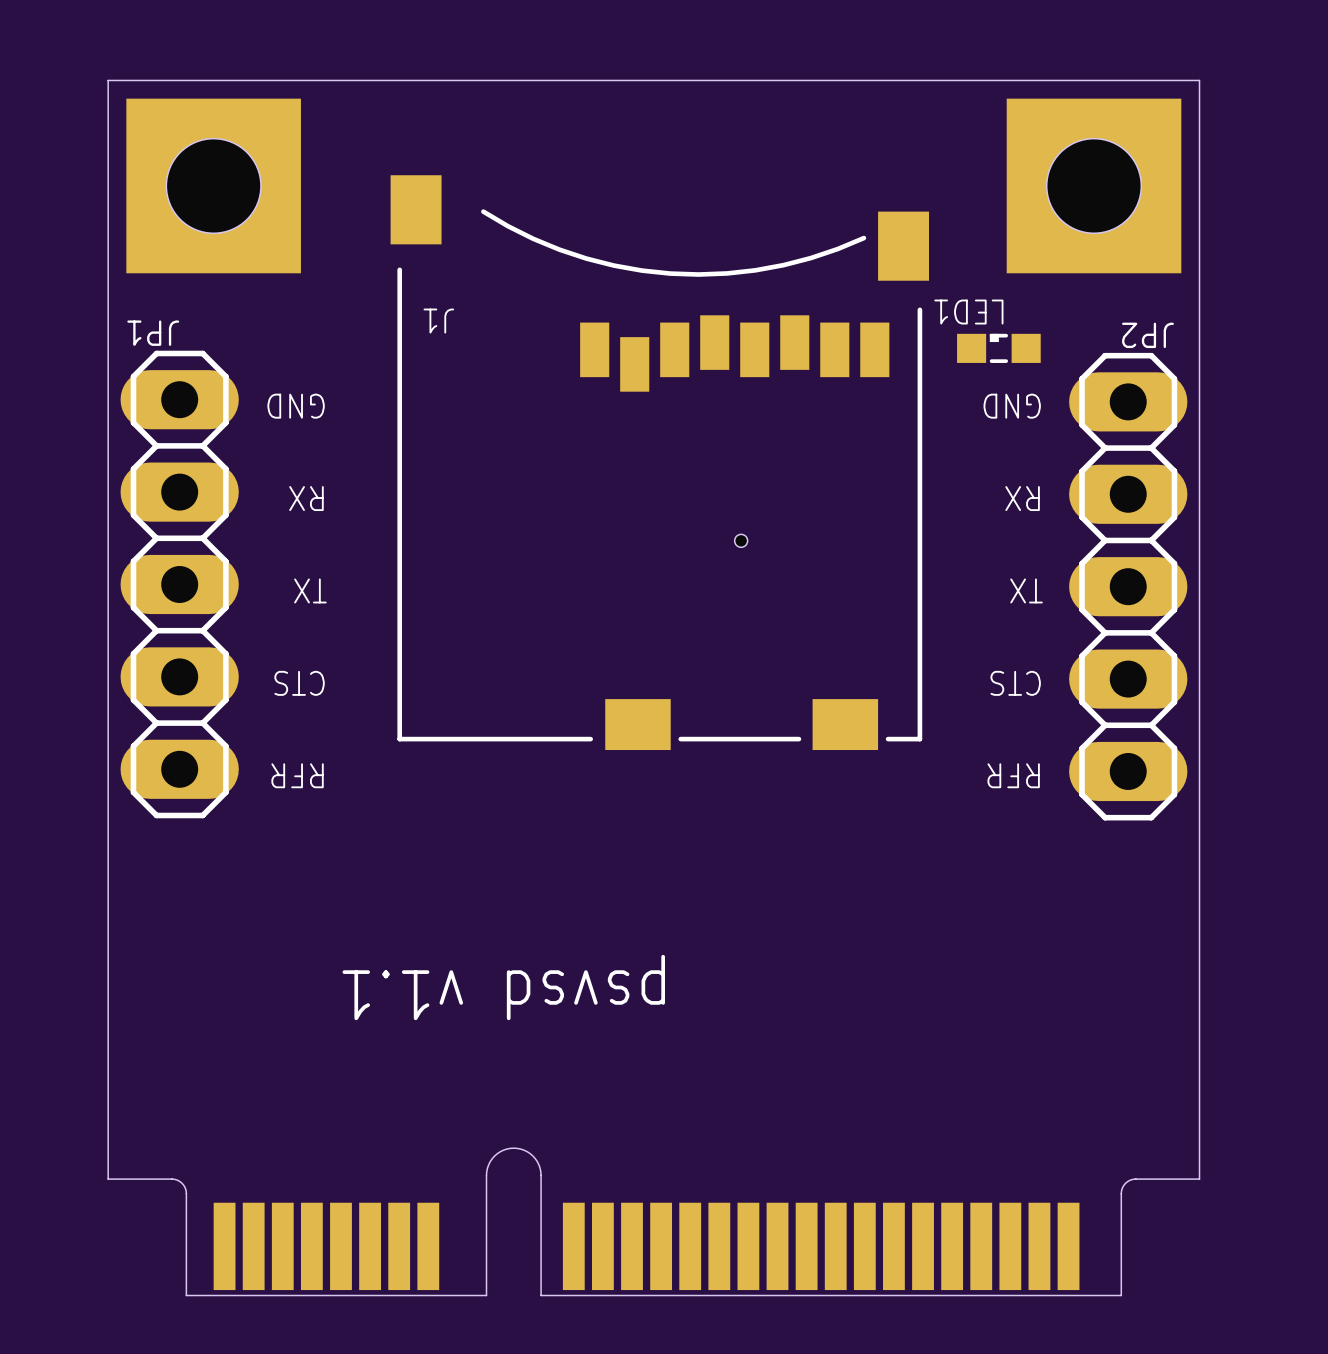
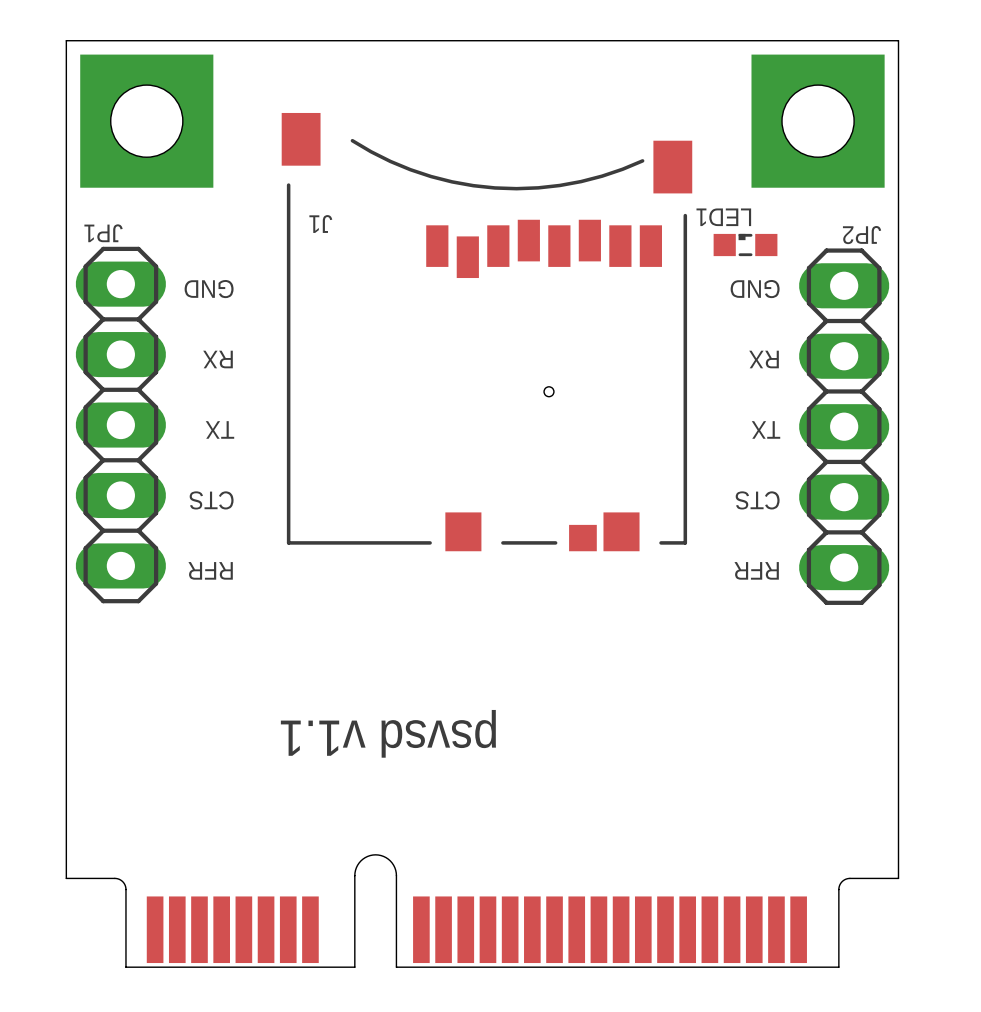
J1 footprint: [390, 175, 930, 751] -> [281, 112, 693, 552]

